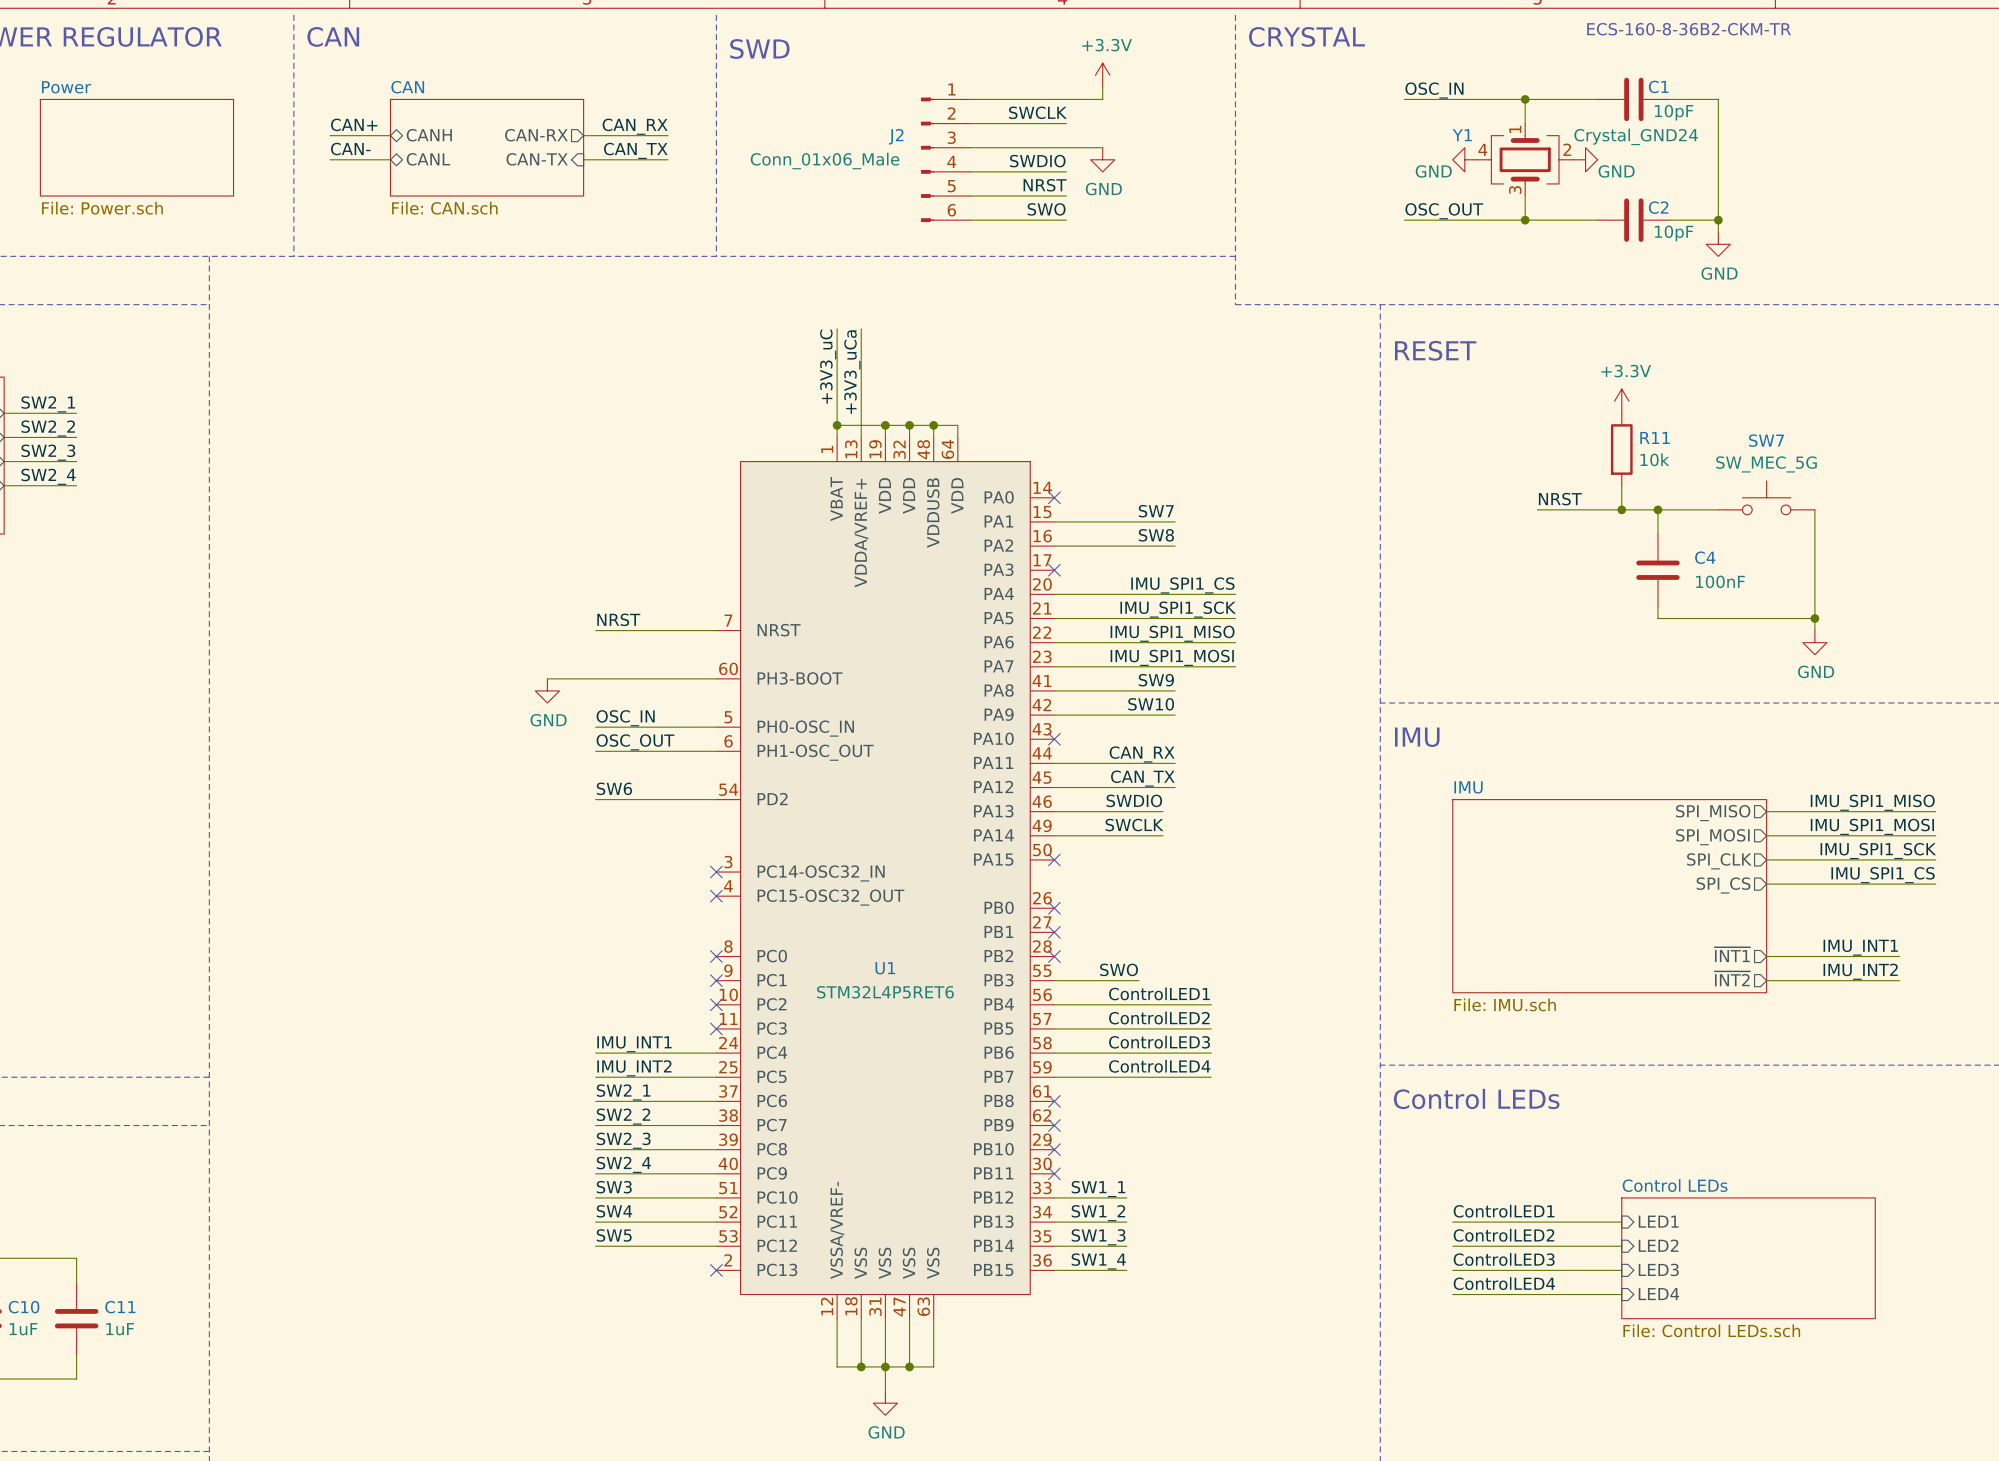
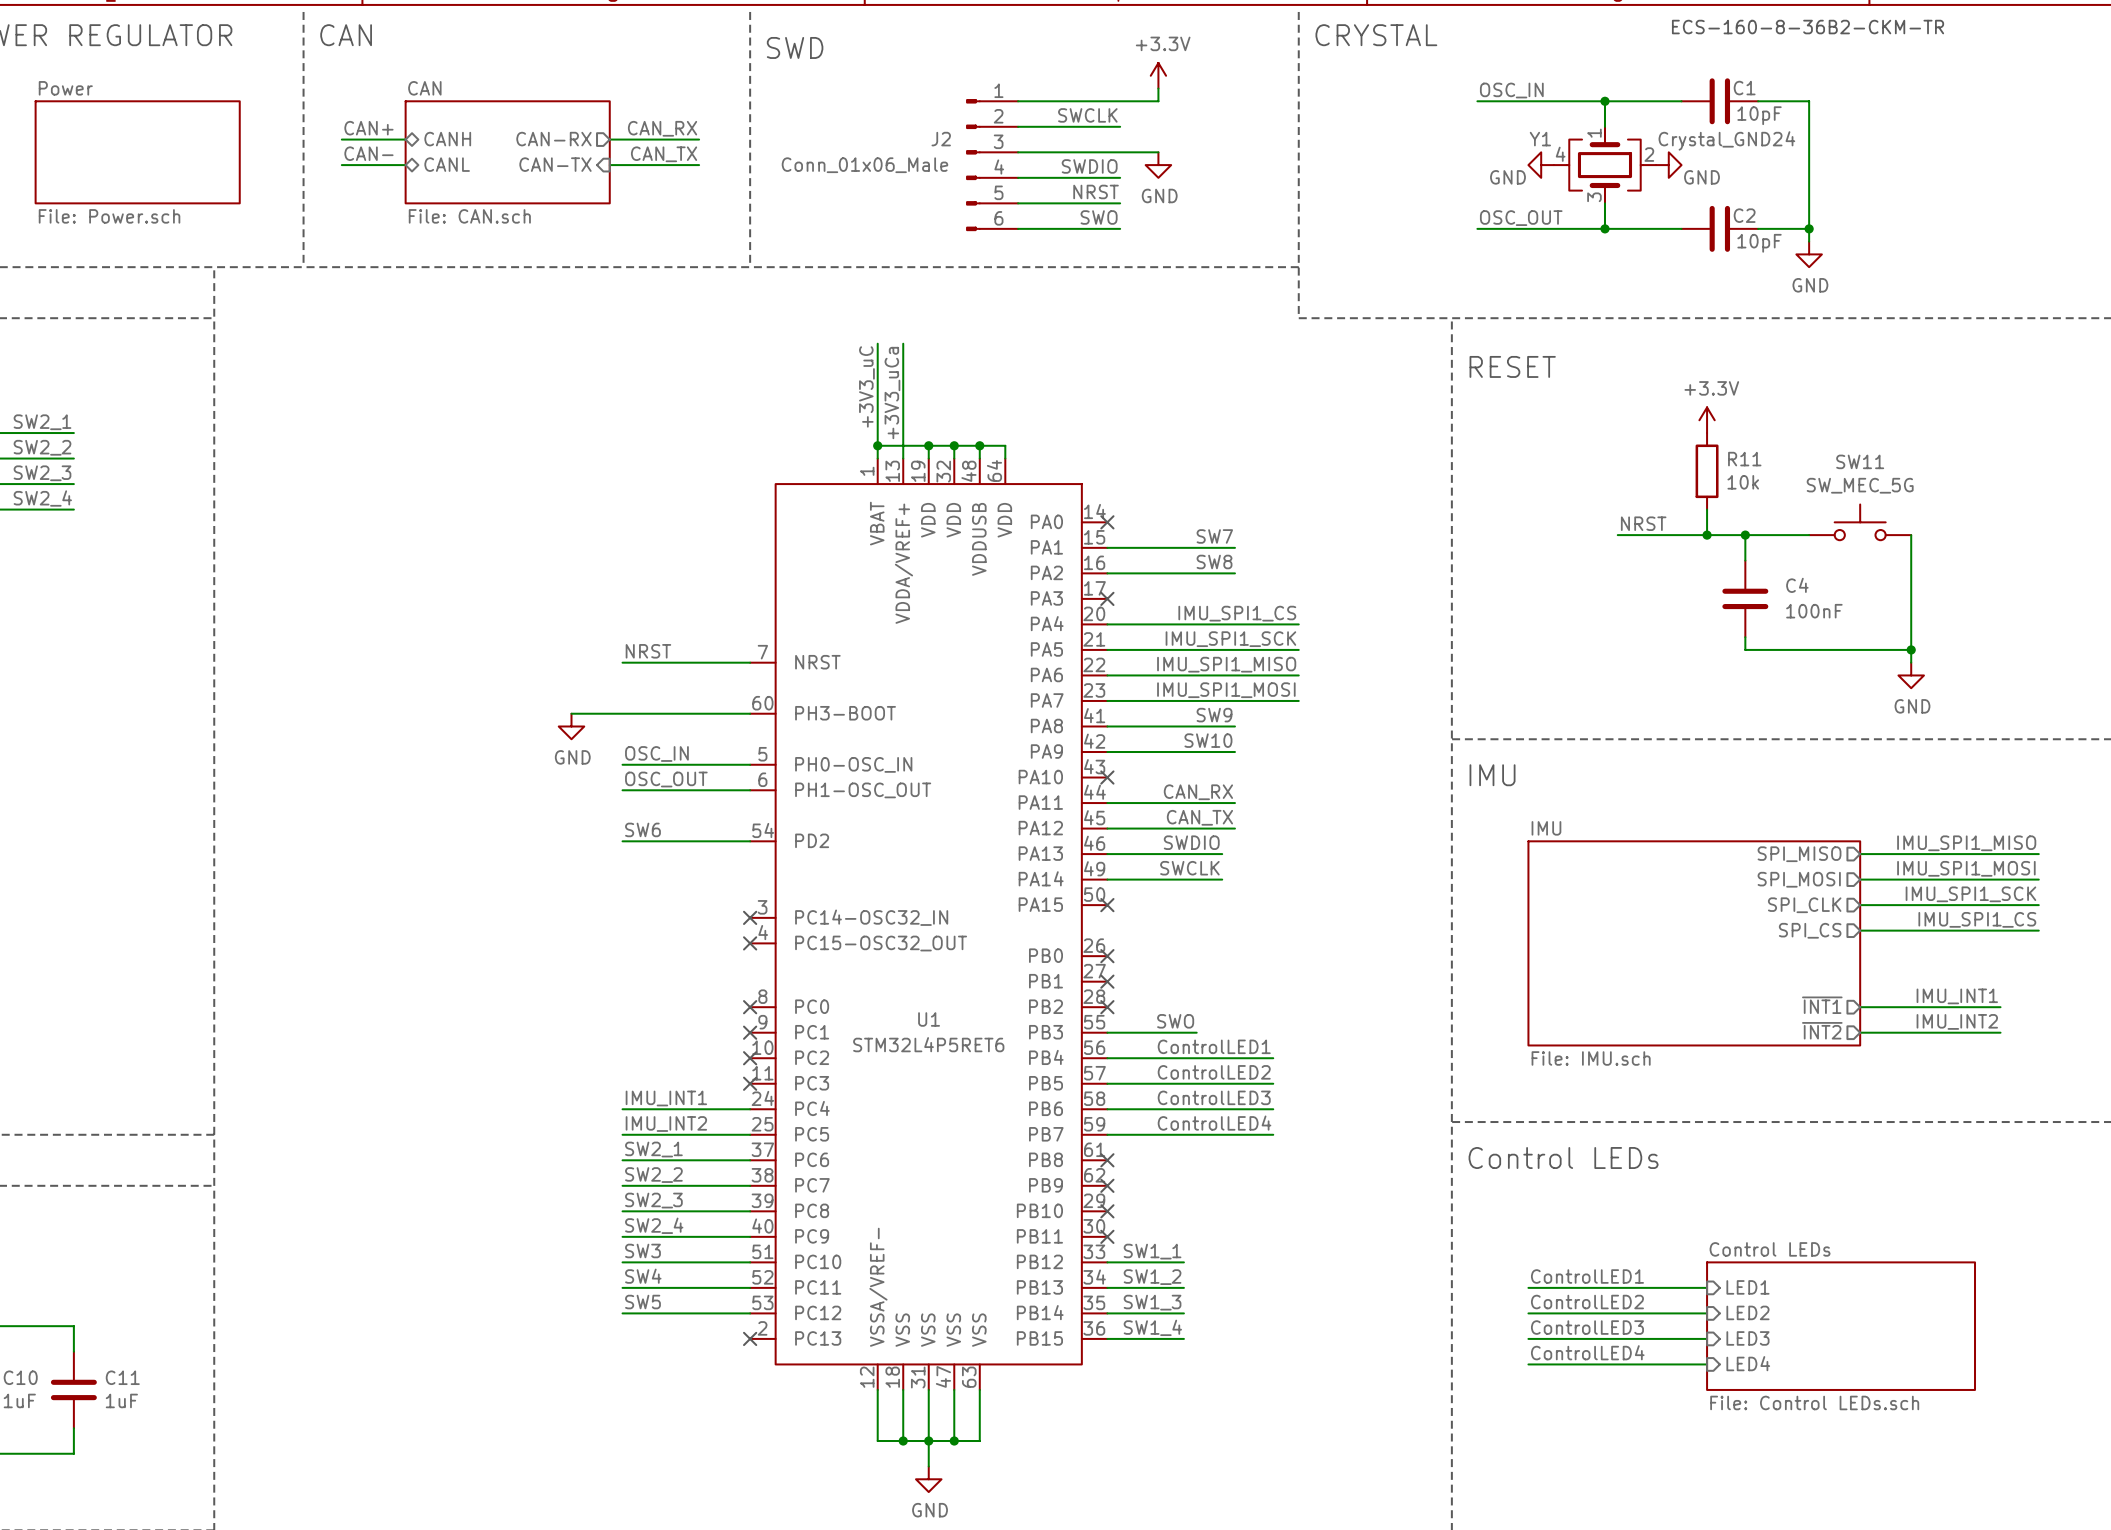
SW7 name: SW7 (1766, 440) -> SW11 (1860, 461)

